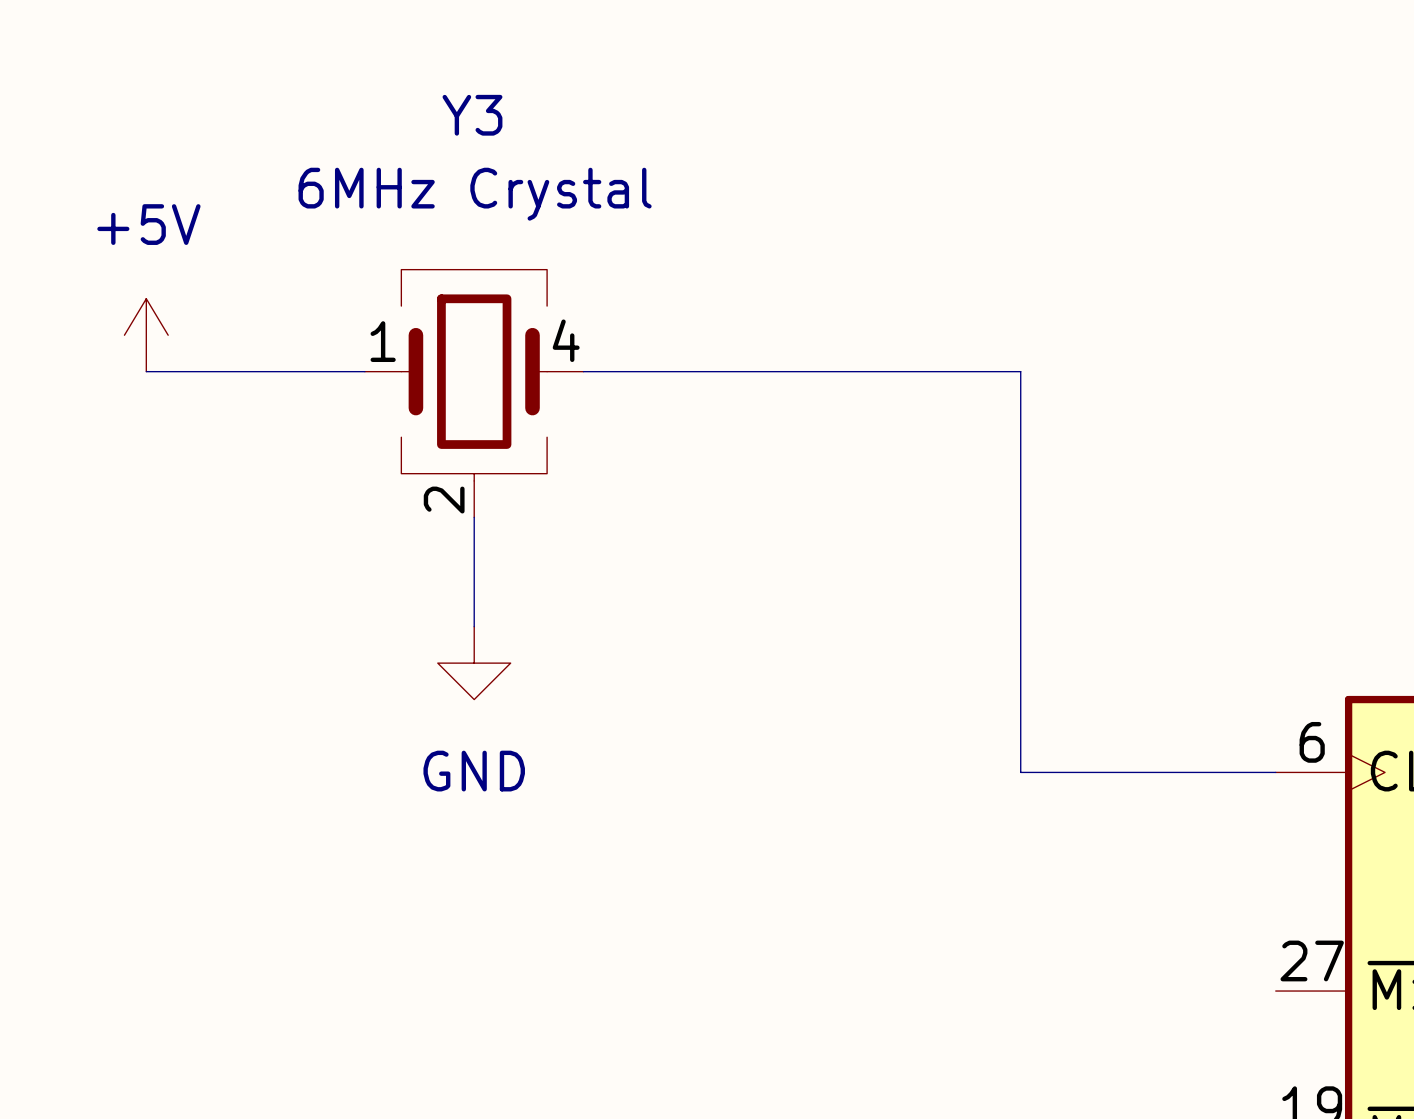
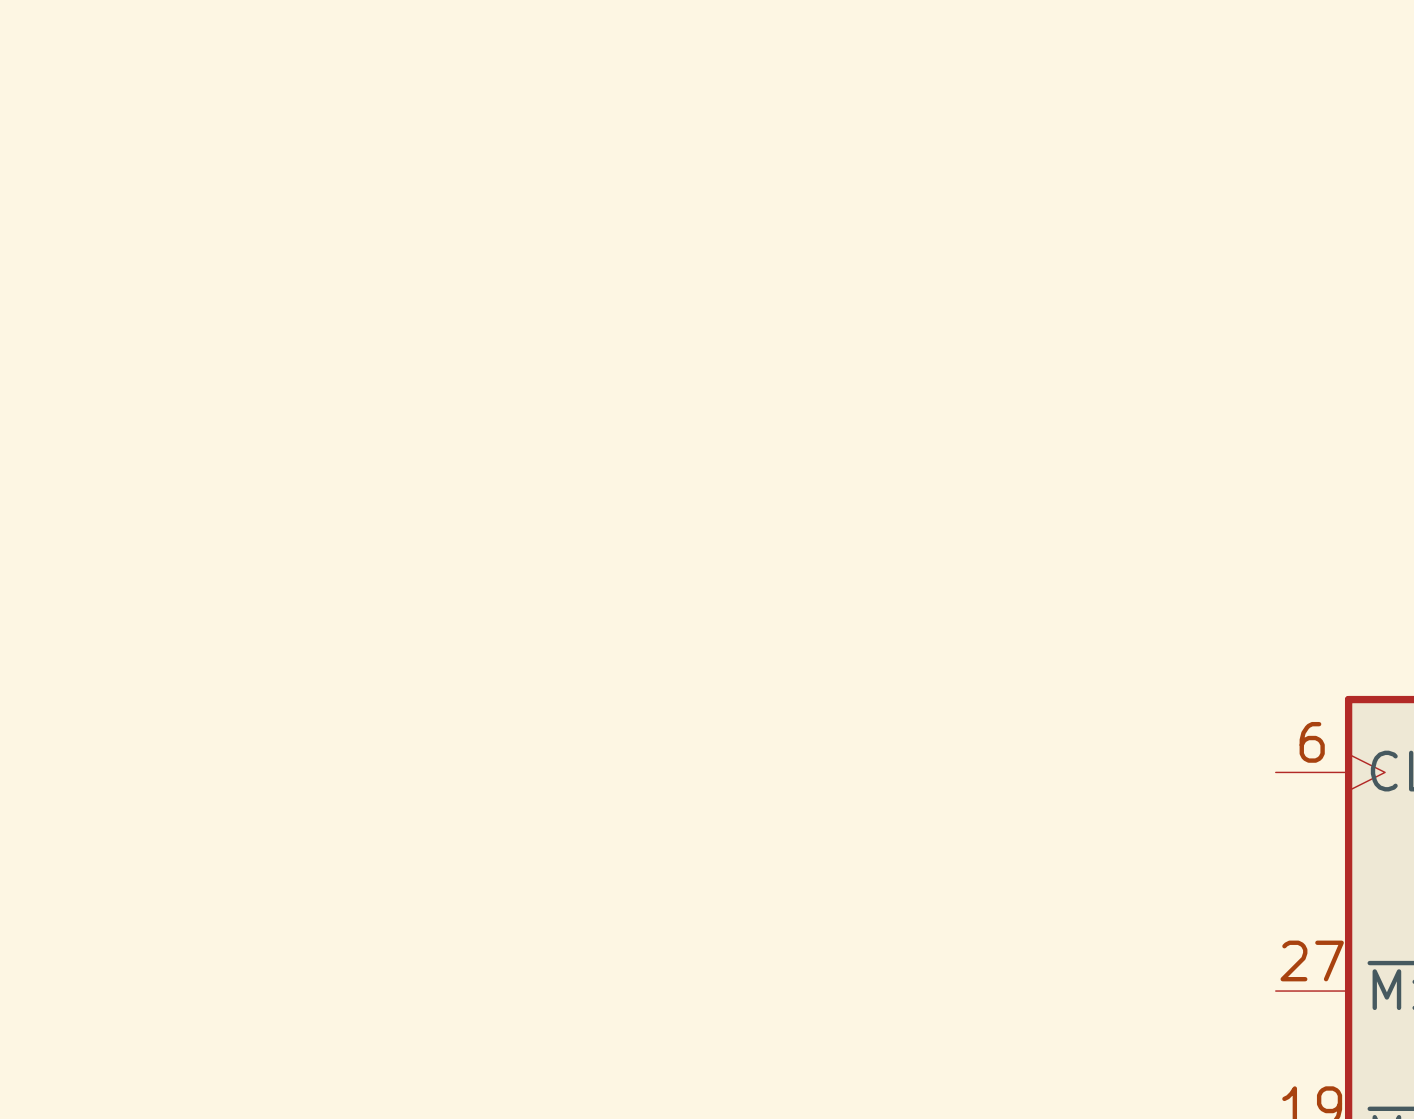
power symbol: +5V (146, 335) -> none
wire: (146, 371) (364, 371) -> none
wire: (583, 371) (1020, 371) (1020, 772) (1275, 772) -> none
Y3: 6MHz Crystal (474, 393) -> none
wire: (474, 517) (474, 626) -> none
power symbol: GND (474, 663) -> none

